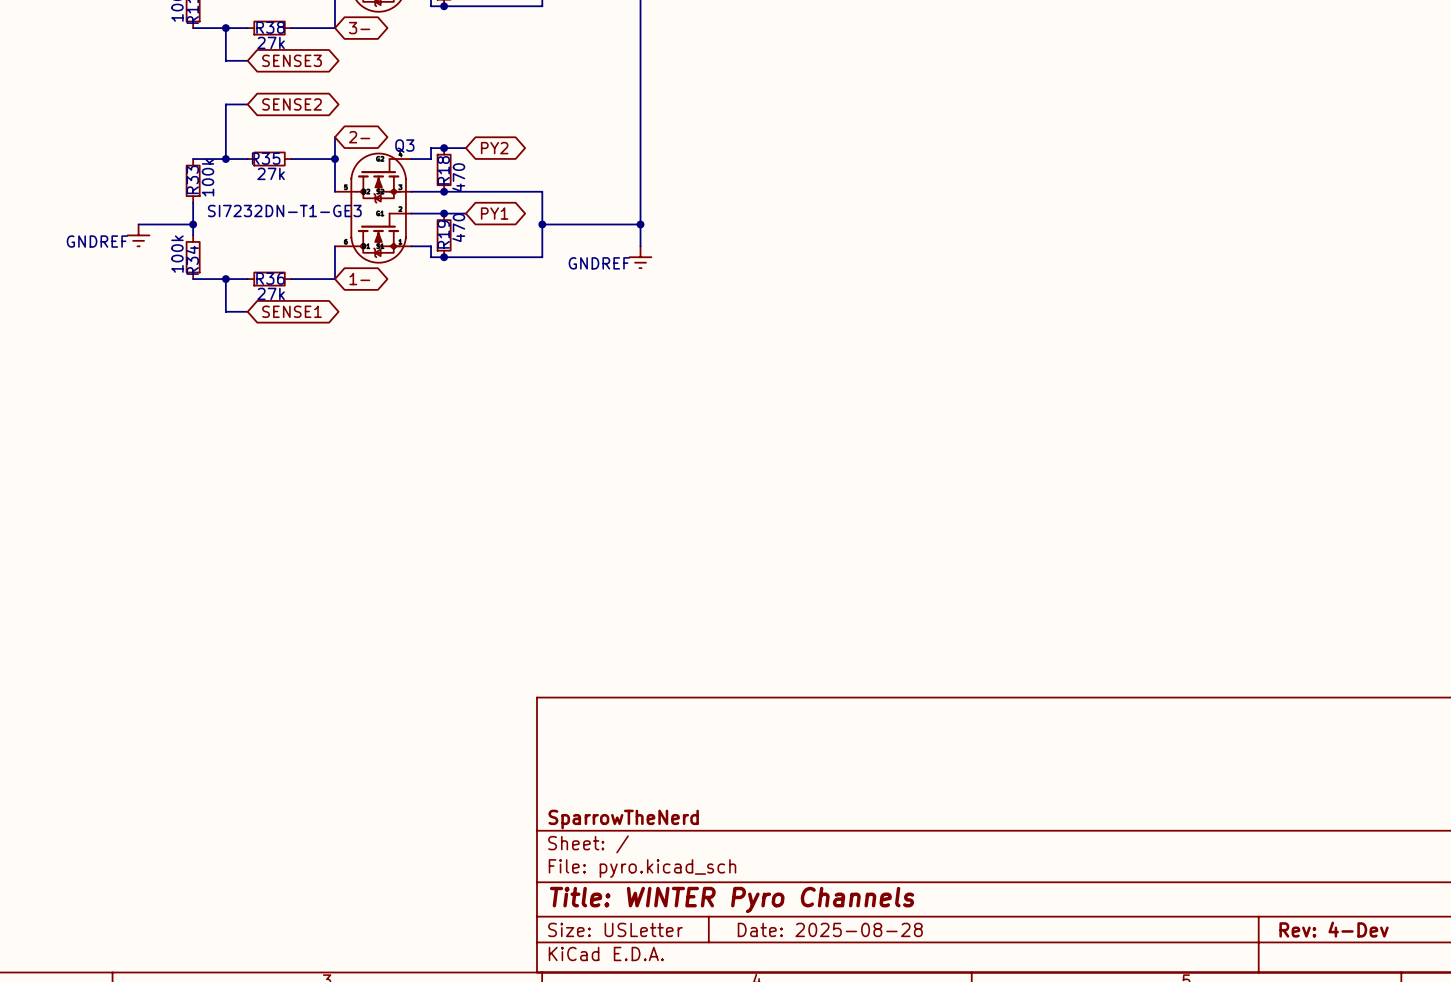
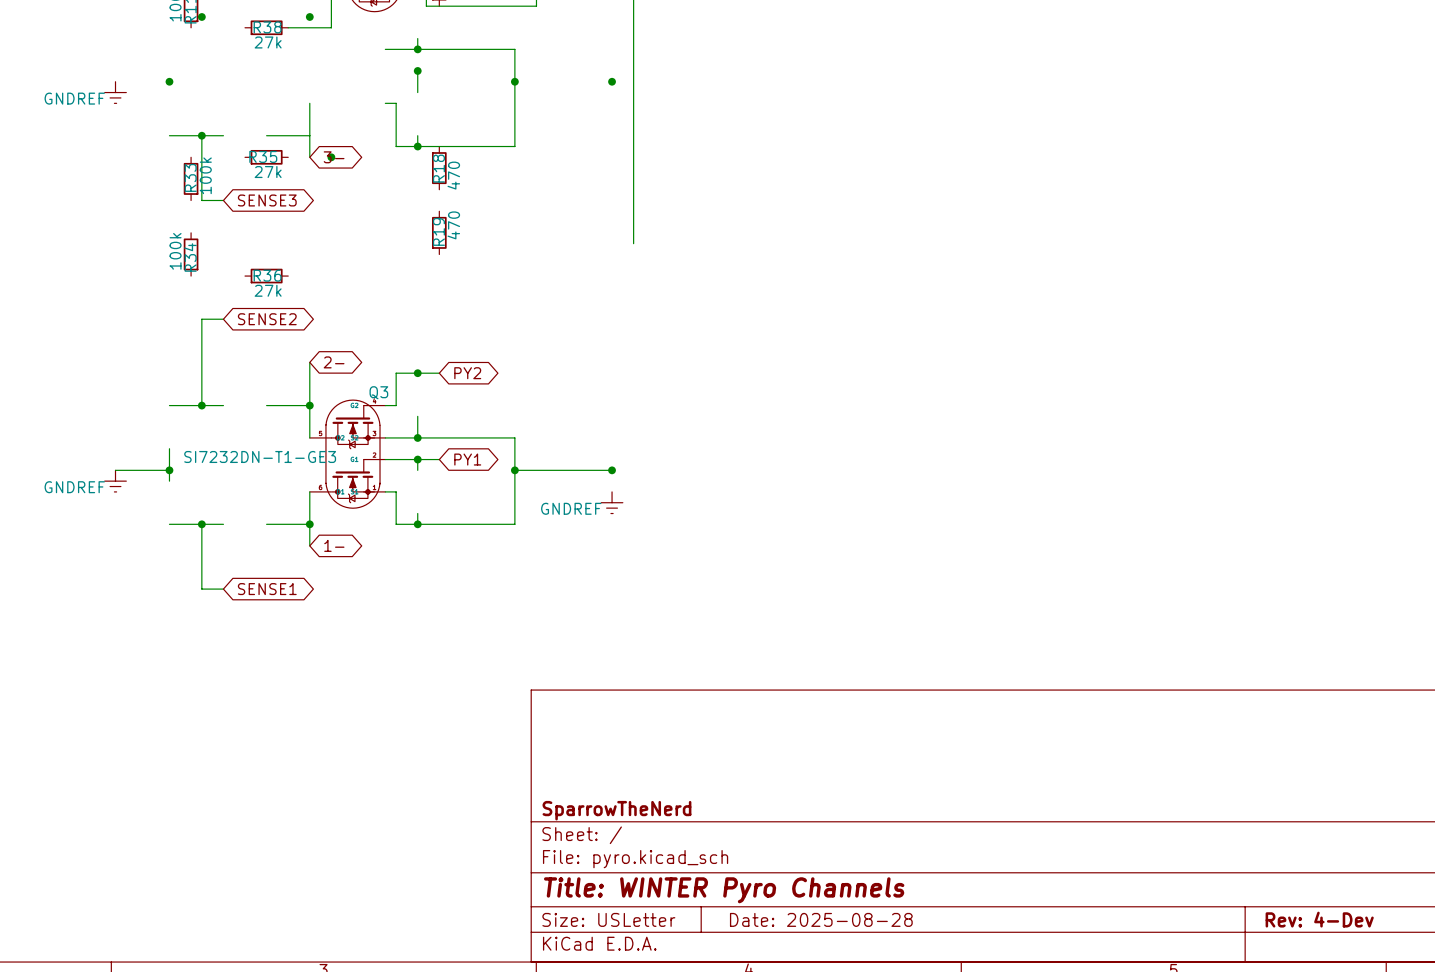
junction: (444, 6) -> none
junction: none -> (201, 16)
junction: none -> (309, 16)
wire: (193, 28) (247, 28) -> none
wire: (225, 28) (225, 60) (247, 60) -> none
junction: (225, 28) -> none
global label position: 3- (359, 28) -> 3- (334, 157)
wire: none -> (417, 38) (417, 49)
wire: none -> (385, 49) (514, 49) (514, 146) (460, 146)
junction: none -> (417, 49)
global label position: SENSE3 (292, 60) -> SENSE3 (267, 200)
wire: none -> (417, 70) (417, 92)
junction: none -> (417, 70)
junction: none -> (169, 81)
junction: none -> (514, 81)
junction: none -> (612, 81)
power symbol: none -> GNDREF (115, 92)
wire: (247, 104) (225, 104) (225, 159) -> none
global label: SENSE2 (292, 104) -> none
wire: none -> (201, 135) (201, 200) (223, 200)
wire: (334, 137) (334, 191) -> (309, 103) (309, 157)
global label: 2- (359, 137) -> none
wire: none -> (417, 135) (417, 146)
wire: (431, 148) (431, 159) (411, 159) -> (426, 146) (396, 146) (396, 103) (385, 103)
junction position: (444, 148) -> (417, 146)
global label: PY2 (494, 148) -> none
wire: (193, 159) (247, 159) -> (169, 135) (223, 135)
junction position: (225, 159) -> (201, 135)
wire: (291, 159) (334, 159) -> (266, 135) (309, 135)
wire: (411, 191) (542, 191) (542, 257) (431, 257) (431, 246) (411, 246) -> none
junction: (444, 191) -> none
wire: (193, 202) (193, 235) -> none
Q3 position: (373, 208) -> (347, 454)
wire: (411, 213) (465, 213) -> none
junction: (444, 213) -> none
global label: PY1 (494, 213) -> none
wire: (138, 224) (193, 224) -> none
junction: (193, 224) -> none
wire: (542, 224) (640, 224) -> none
junction: (542, 224) -> none
junction: (640, 224) -> none
power symbol: GNDREF (138, 235) -> none
wire: (334, 246) (334, 279) (291, 279) -> none
junction: (444, 257) -> none
power symbol: GNDREF (640, 257) -> none
wire: (193, 279) (247, 279) -> (169, 405) (223, 405)
wire: (225, 279) (225, 311) (247, 311) -> none
junction: (225, 279) -> none
global label: 1- (359, 279) -> none
global label: SENSE1 (292, 311) -> SENSE2 (267, 319)
wire: none -> (223, 319) (201, 319) (201, 405)
wire: none -> (309, 362) (309, 437)
global label: none -> 2- (334, 362)
junction: none -> (417, 373)
wire: none -> (439, 373) (396, 373) (396, 405) (385, 405)
global label: none -> PY2 (467, 373)
junction: none -> (201, 405)
wire: none -> (266, 405) (309, 405)
junction: none -> (309, 405)
wire: none -> (417, 416) (417, 437)
wire: none -> (385, 437) (514, 437) (514, 524) (396, 524) (396, 491) (385, 491)
junction: none -> (417, 437)
wire: none -> (169, 448) (169, 481)
wire: none -> (385, 459) (439, 459)
wire: none -> (417, 459) (417, 470)
junction: none -> (417, 459)
global label: none -> PY1 (467, 459)
wire: none -> (115, 470) (169, 470)
junction: none -> (169, 470)
wire: none -> (514, 470) (612, 470)
junction: none -> (514, 470)
junction: none -> (612, 470)
power symbol: none -> GNDREF (115, 481)
wire: none -> (309, 491) (309, 545)
power symbol: none -> GNDREF (612, 502)
wire: none -> (417, 513) (417, 524)
wire: none -> (169, 524) (223, 524)
wire: none -> (201, 524) (201, 589) (223, 589)
junction: none -> (201, 524)
wire: none -> (266, 524) (309, 524)
junction: none -> (309, 524)
junction: none -> (417, 524)
global label: none -> 1- (334, 545)
global label: none -> SENSE1 (267, 589)

